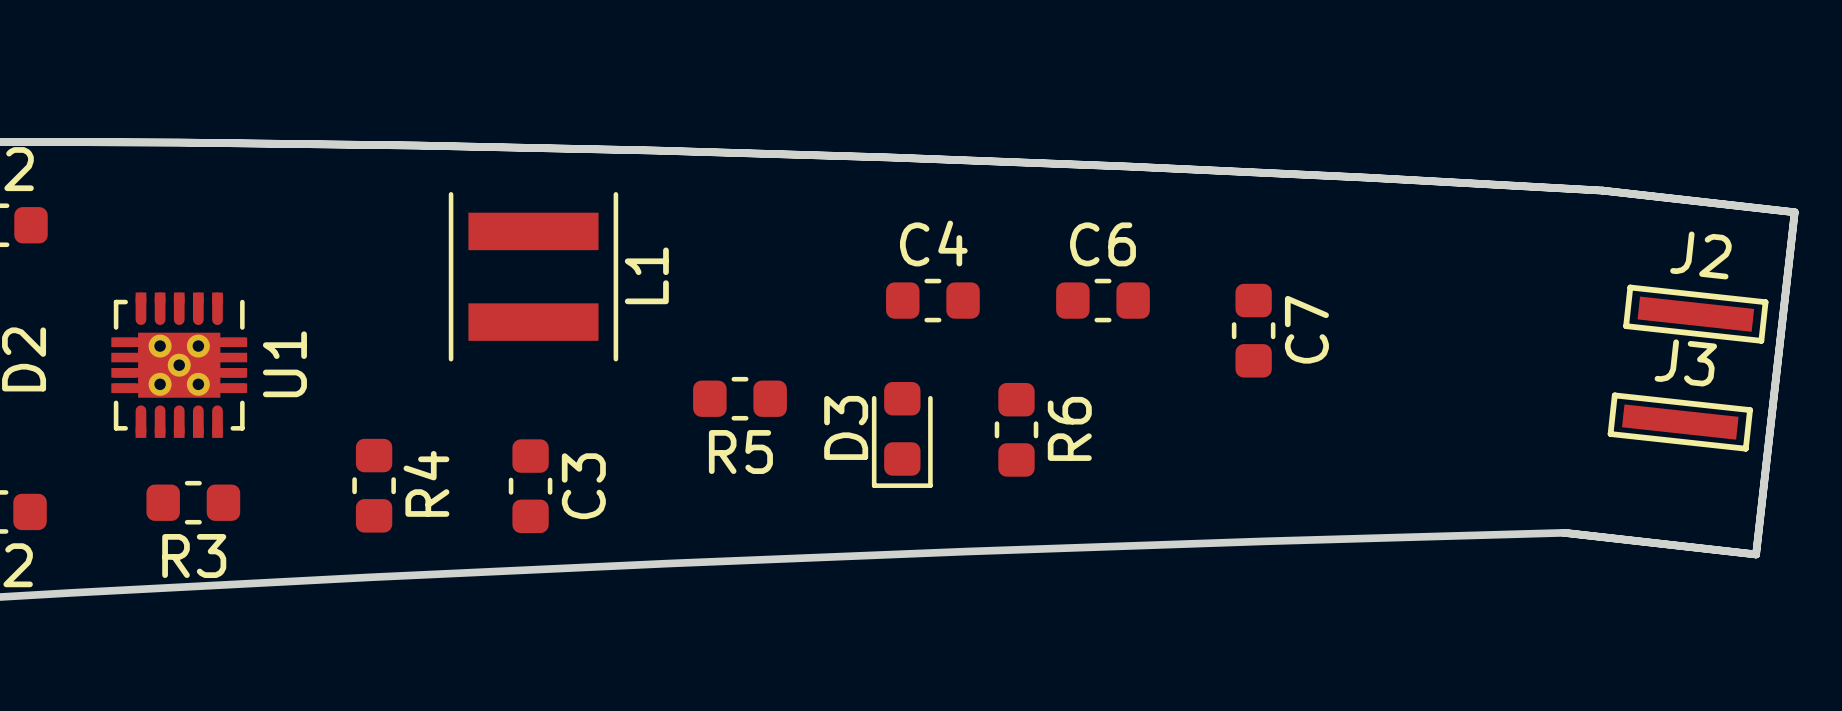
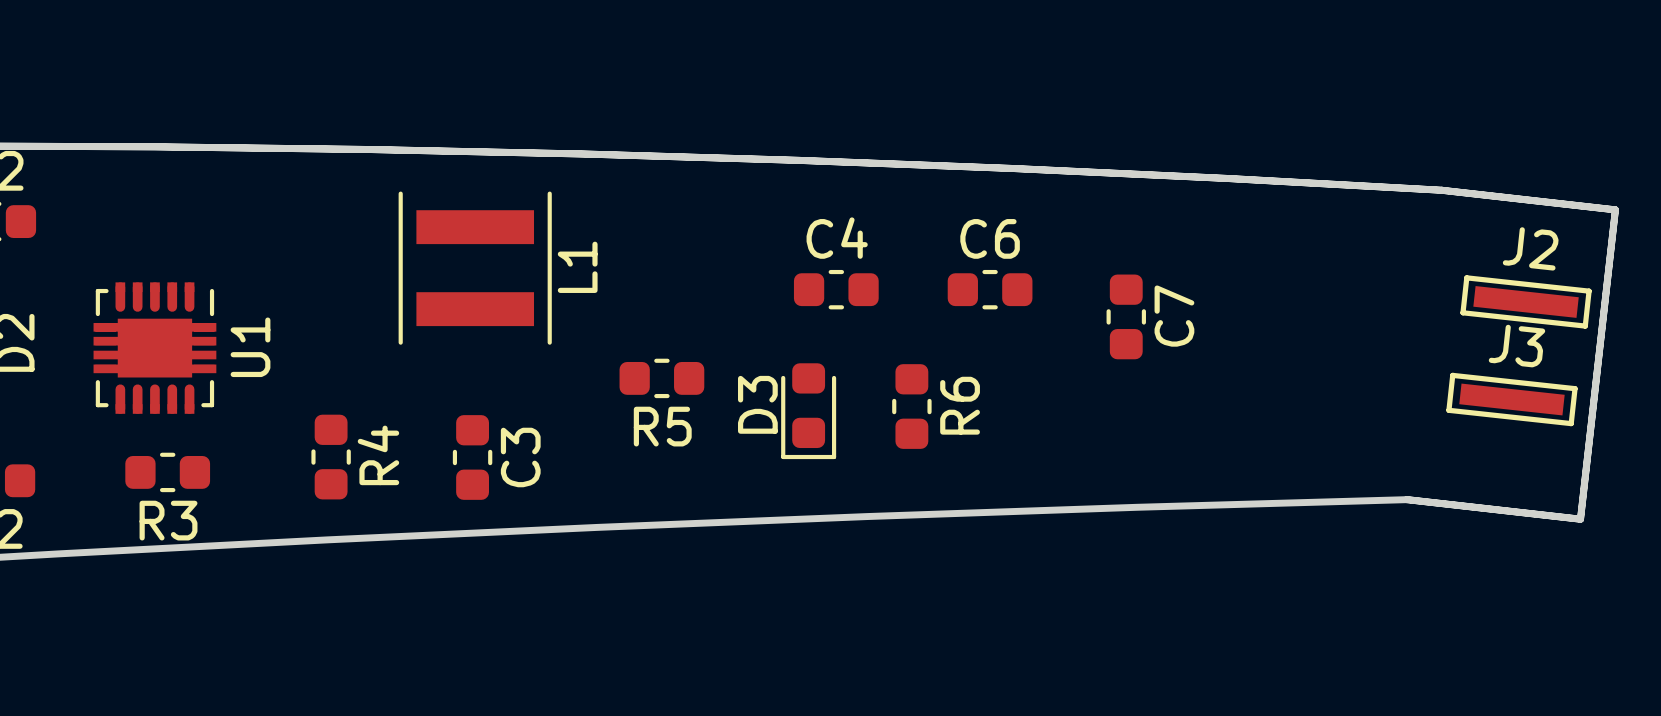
U1 footprint: [111, 292, 248, 438] -> [93, 282, 217, 414]

